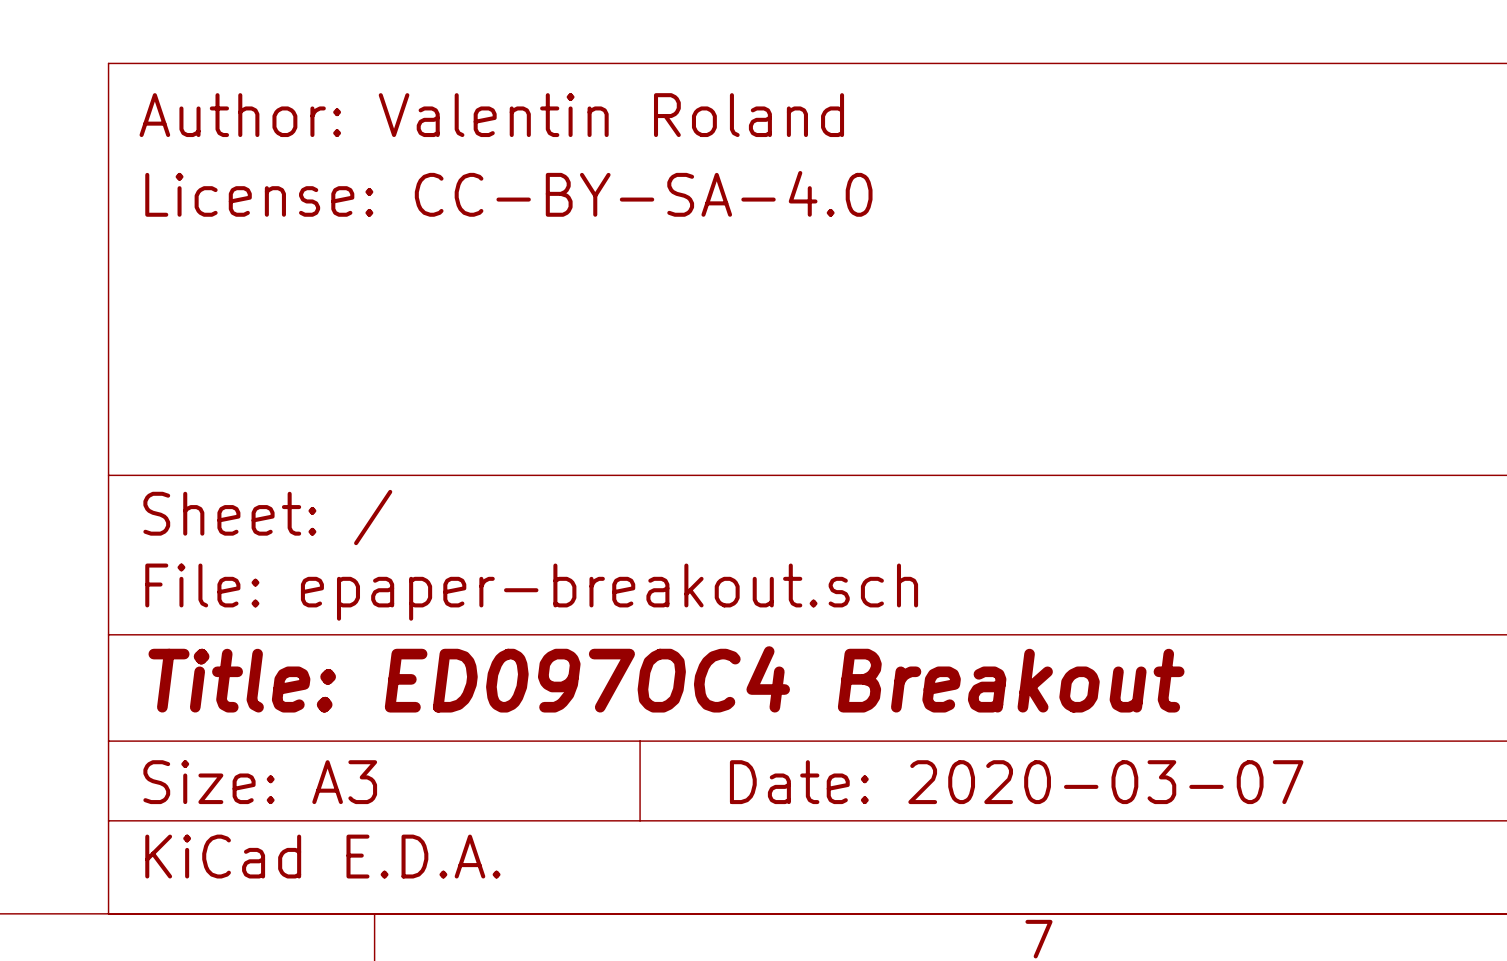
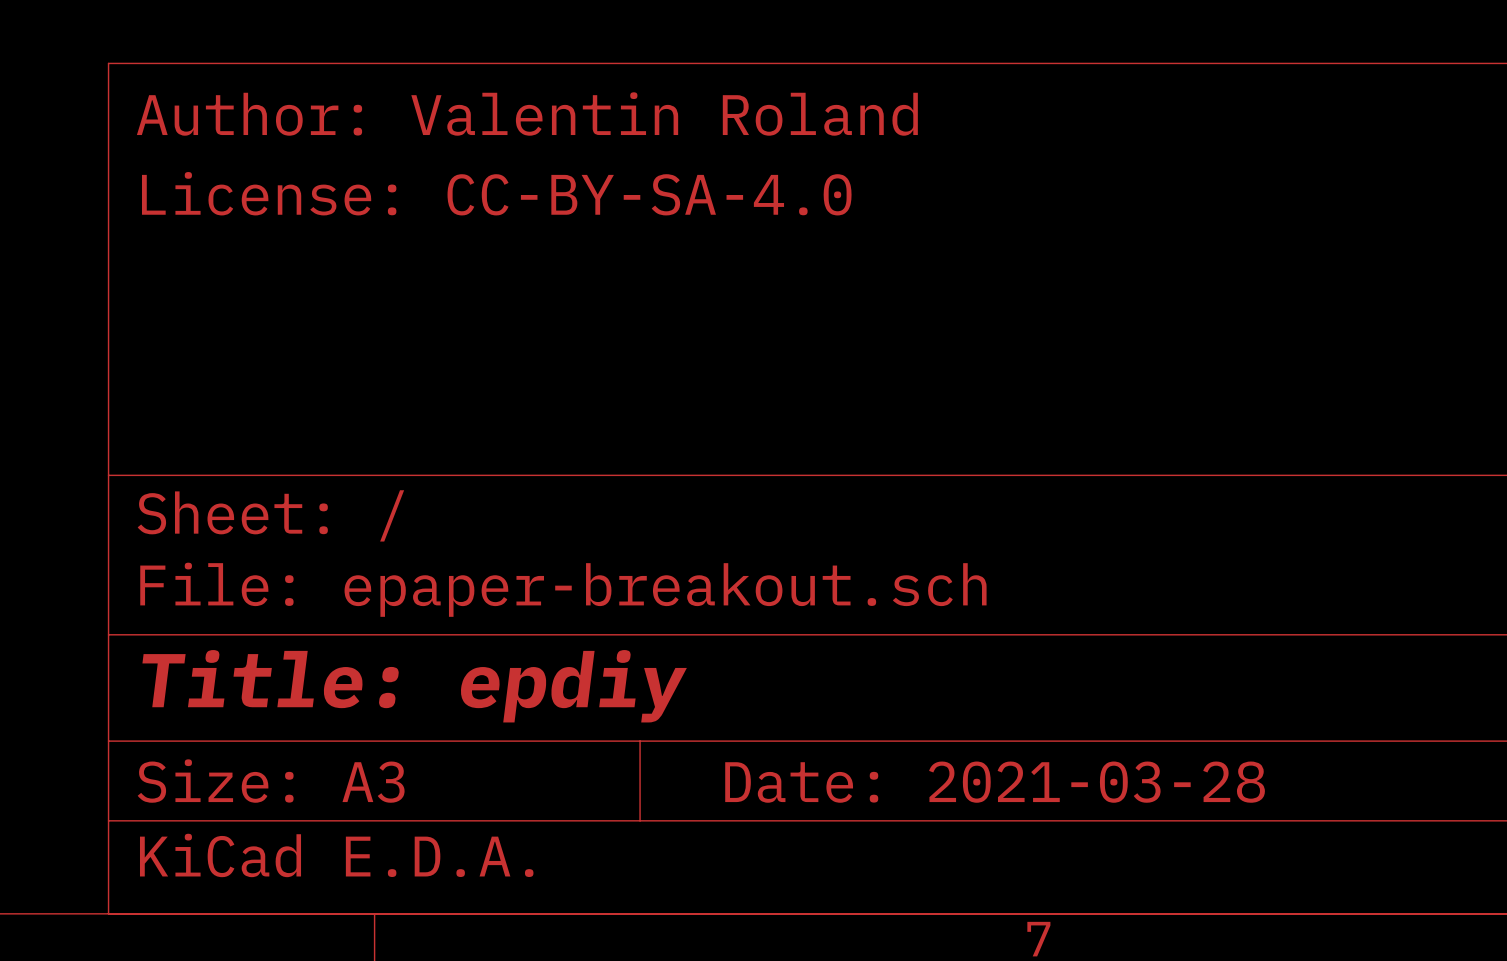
title block: Title: ED097OC4 Breakout (666, 679) -> Title: epdiy (414, 686)
title block: Date: 2020-03-07 (1016, 782) -> Date: 2021-03-28 (995, 782)

